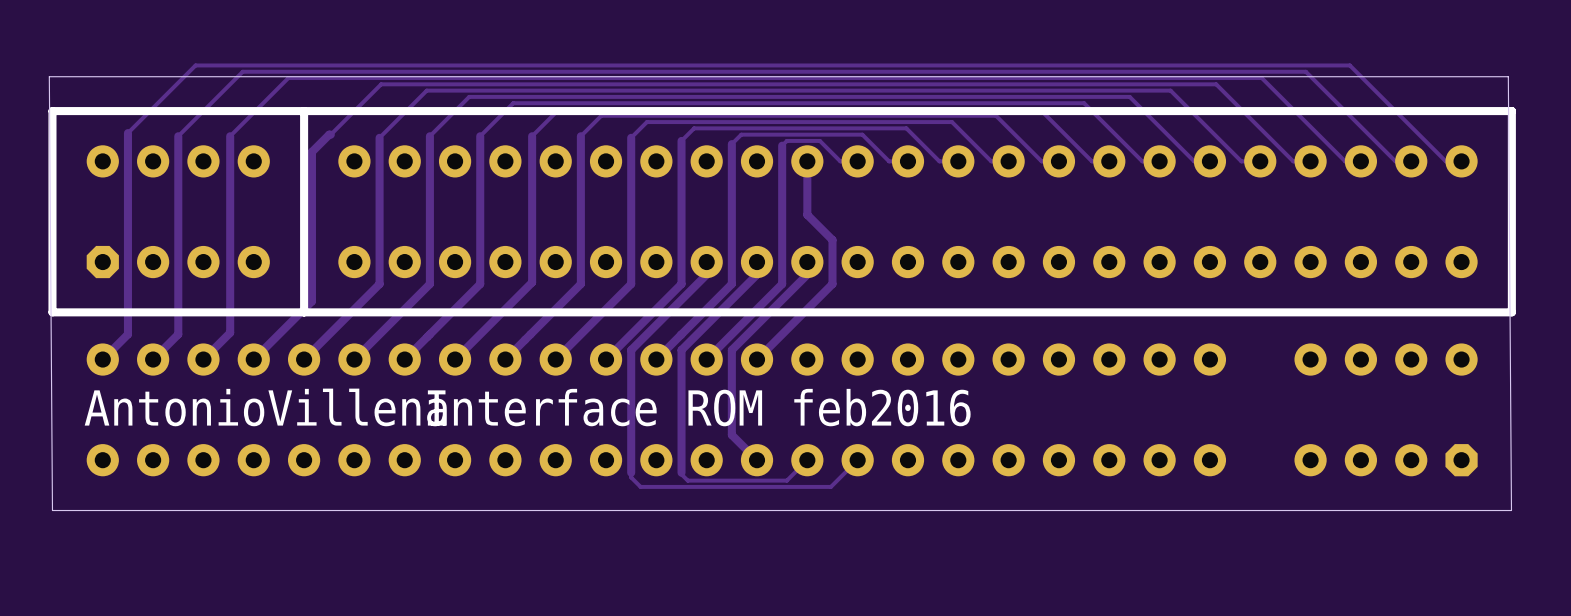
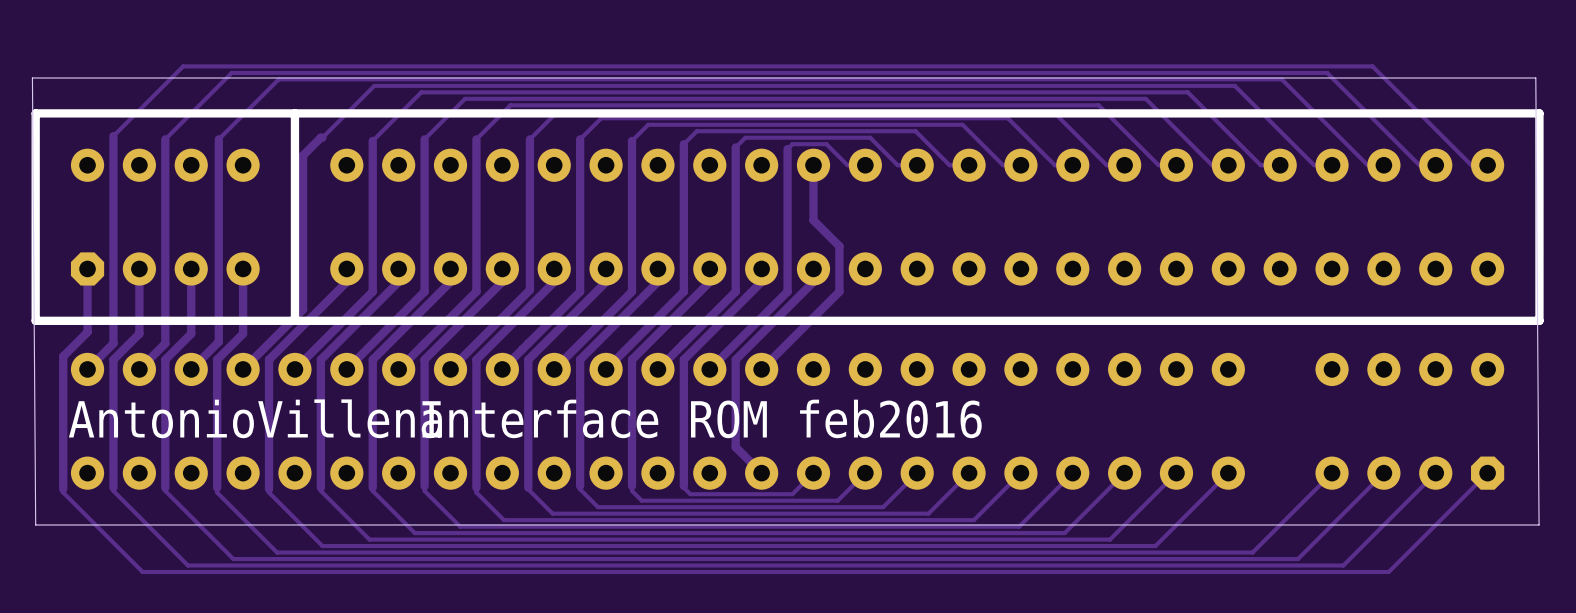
track: none -> (87, 268) (87, 332) (63, 356) (63, 492) (142, 571) (1388, 571) (1487, 473)
track: none -> (139, 268) (139, 333) (113, 359) (113, 490) (188, 565) (1343, 565) (1435, 473)
track: none -> (191, 268) (191, 333) (165, 359) (165, 490) (233, 559) (1298, 559) (1383, 473)
track: none -> (243, 268) (243, 333) (217, 359) (217, 492) (277, 552) (1252, 552) (1332, 473)
track: none -> (346, 268) (346, 281) (269, 359) (269, 492) (322, 546) (1155, 546) (1228, 473)
track: none -> (398, 268) (398, 281) (320, 359) (320, 490) (369, 539) (1110, 539) (1176, 473)
track: none -> (450, 268) (450, 281) (372, 359) (372, 490) (414, 533) (1064, 533) (1124, 473)
track: none -> (502, 268) (502, 281) (424, 359) (424, 490) (460, 526) (1019, 526) (1072, 473)
track: none -> (554, 268) (554, 281) (476, 359) (476, 492) (503, 520) (973, 520) (1020, 473)
track: none -> (606, 268) (606, 281) (528, 359) (528, 489) (552, 513) (928, 513) (969, 473)
track: none -> (657, 268) (657, 281) (580, 359) (580, 489) (597, 507) (883, 507) (917, 473)

